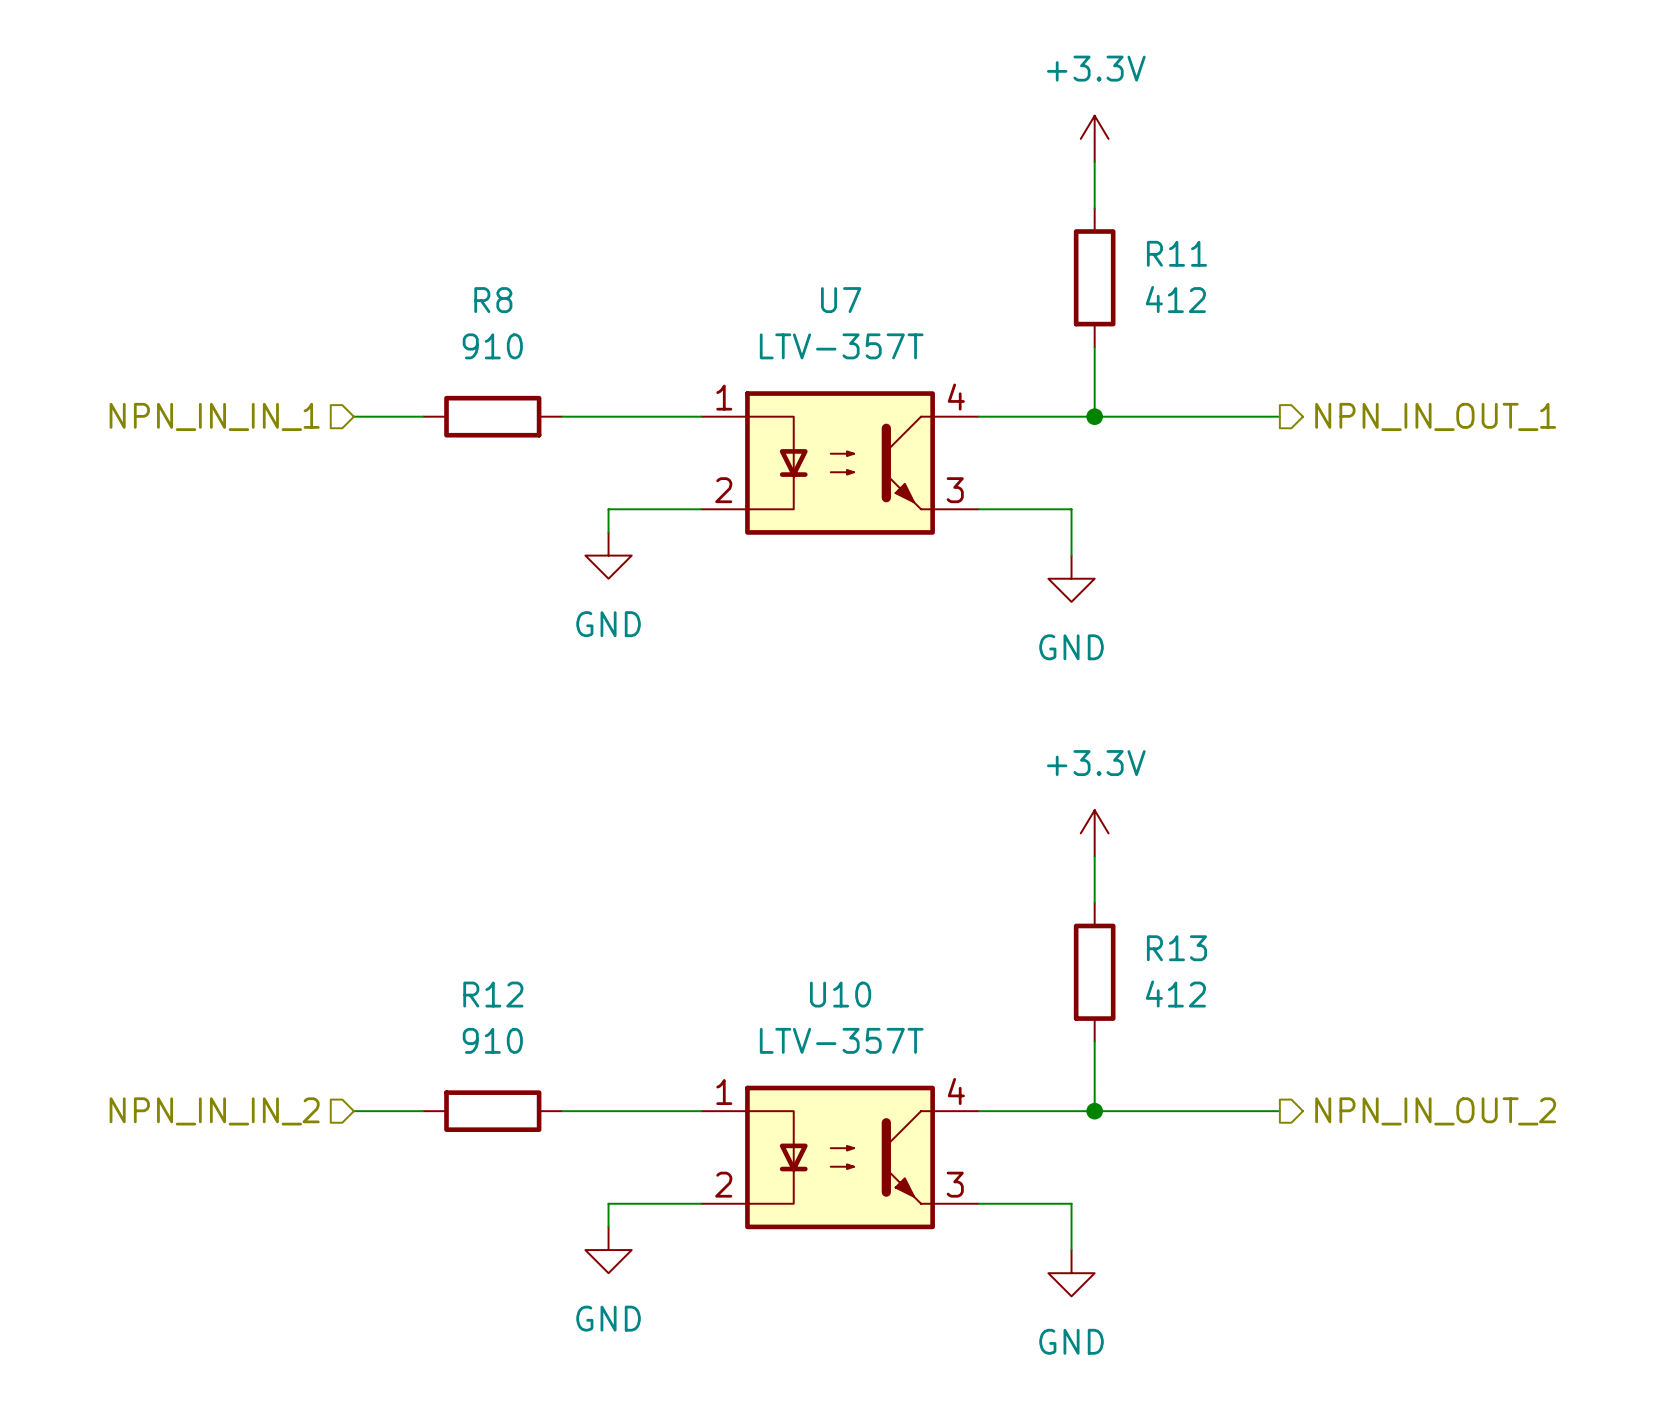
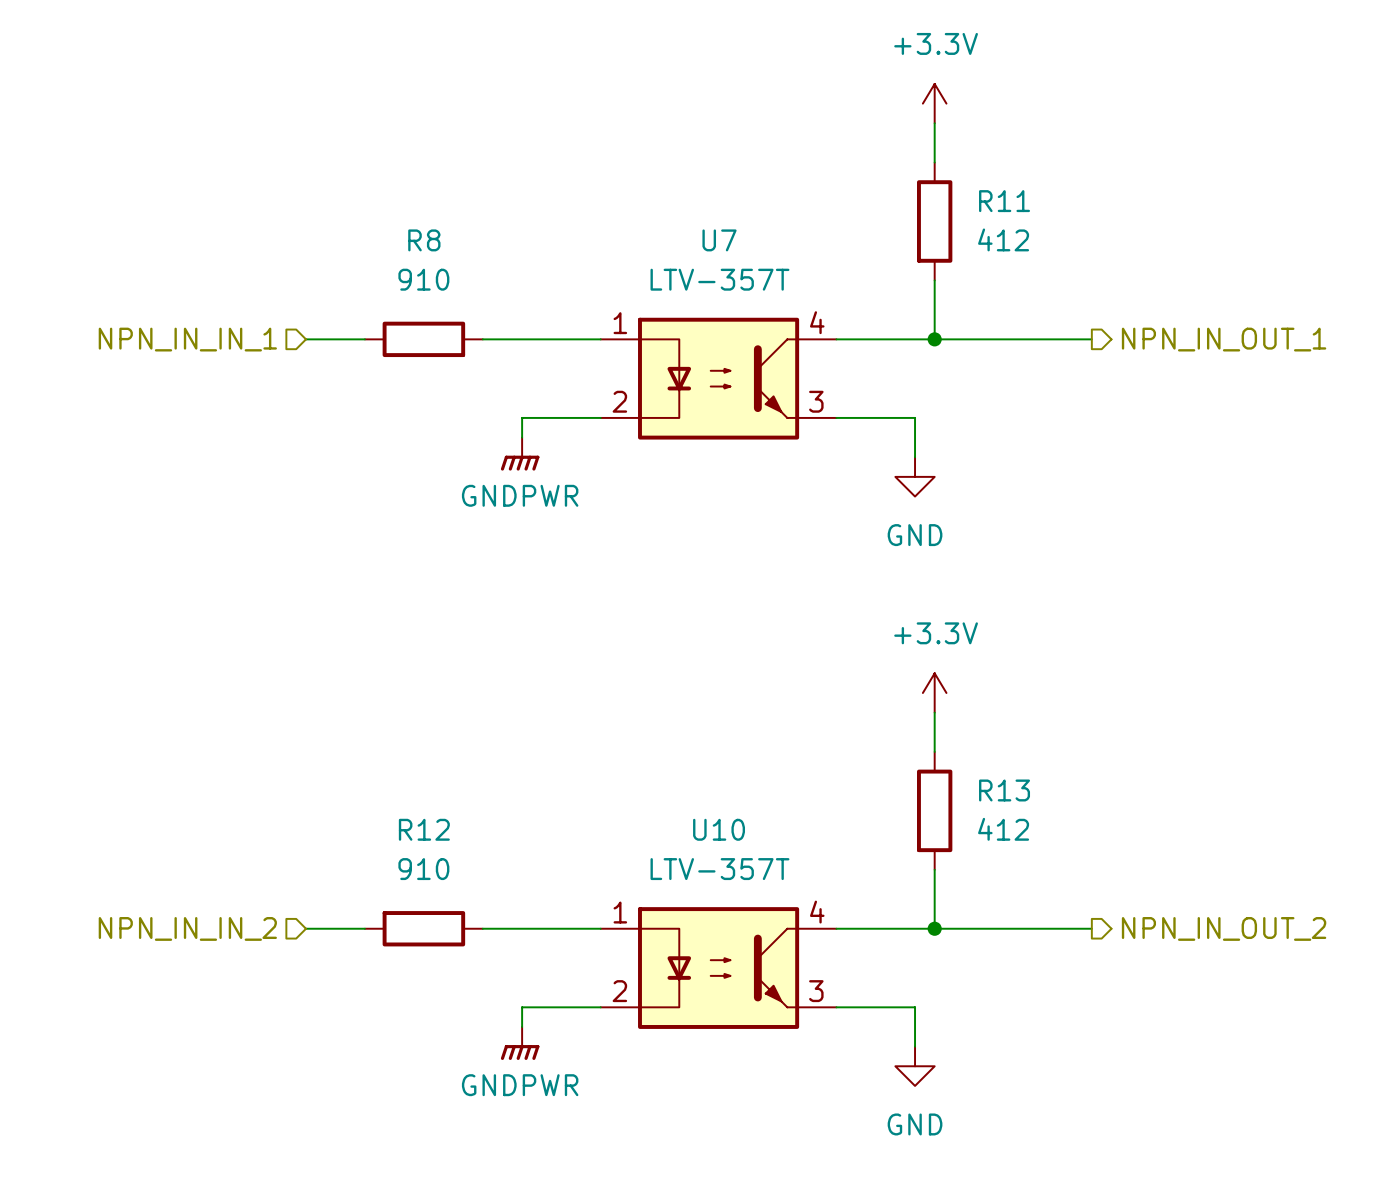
power symbol: GND (608, 555) -> GNDPWR (520, 454)
power symbol: GND (608, 1250) -> GNDPWR (520, 1043)

